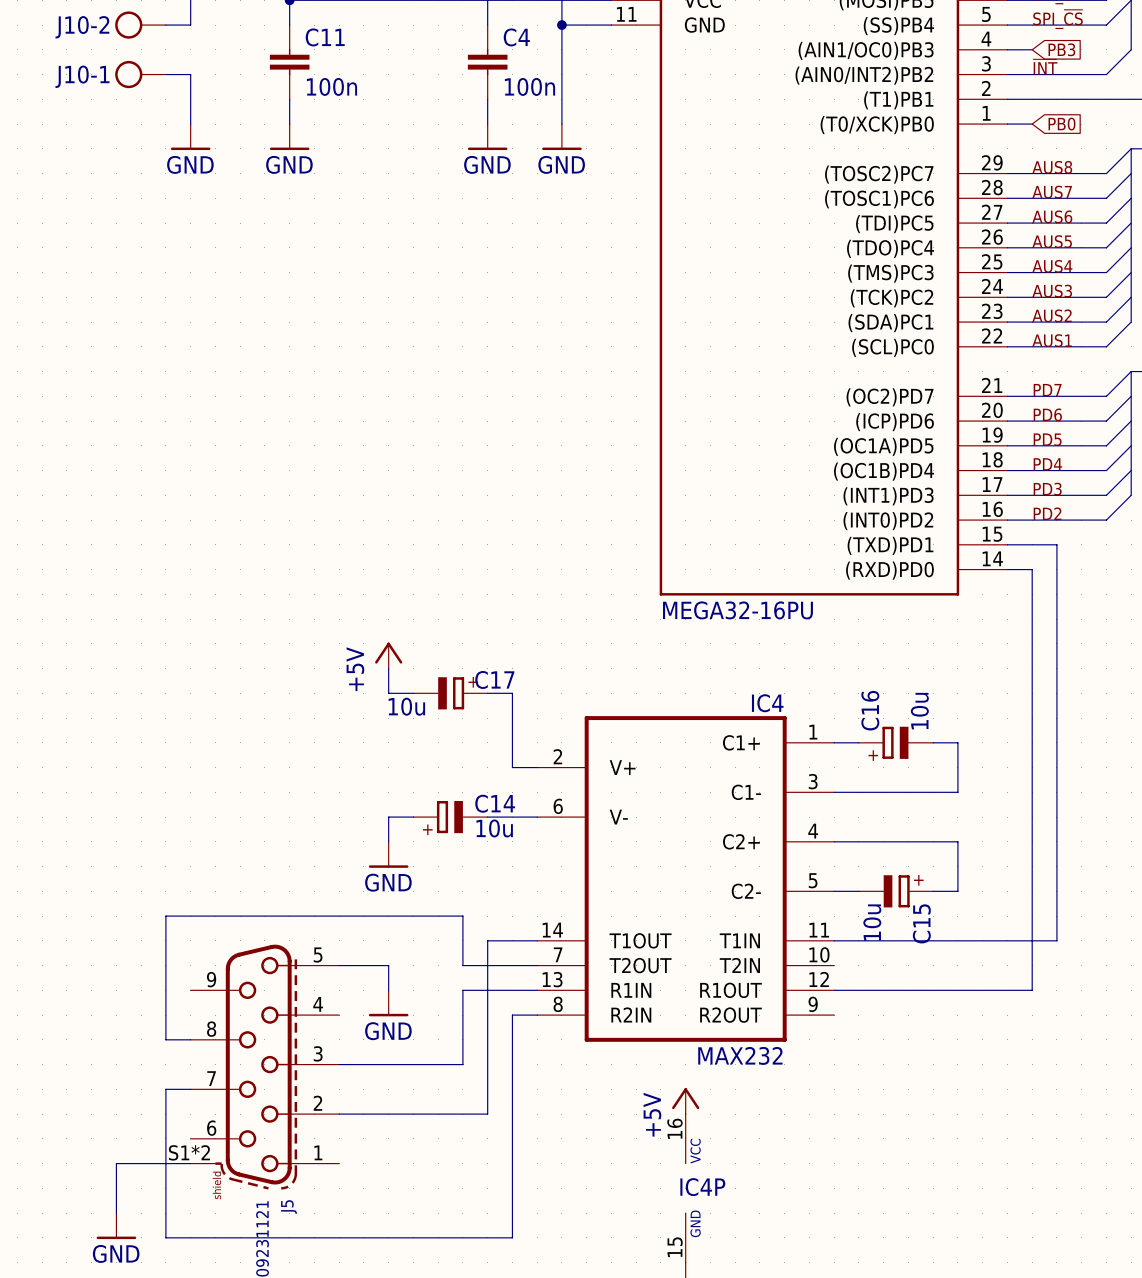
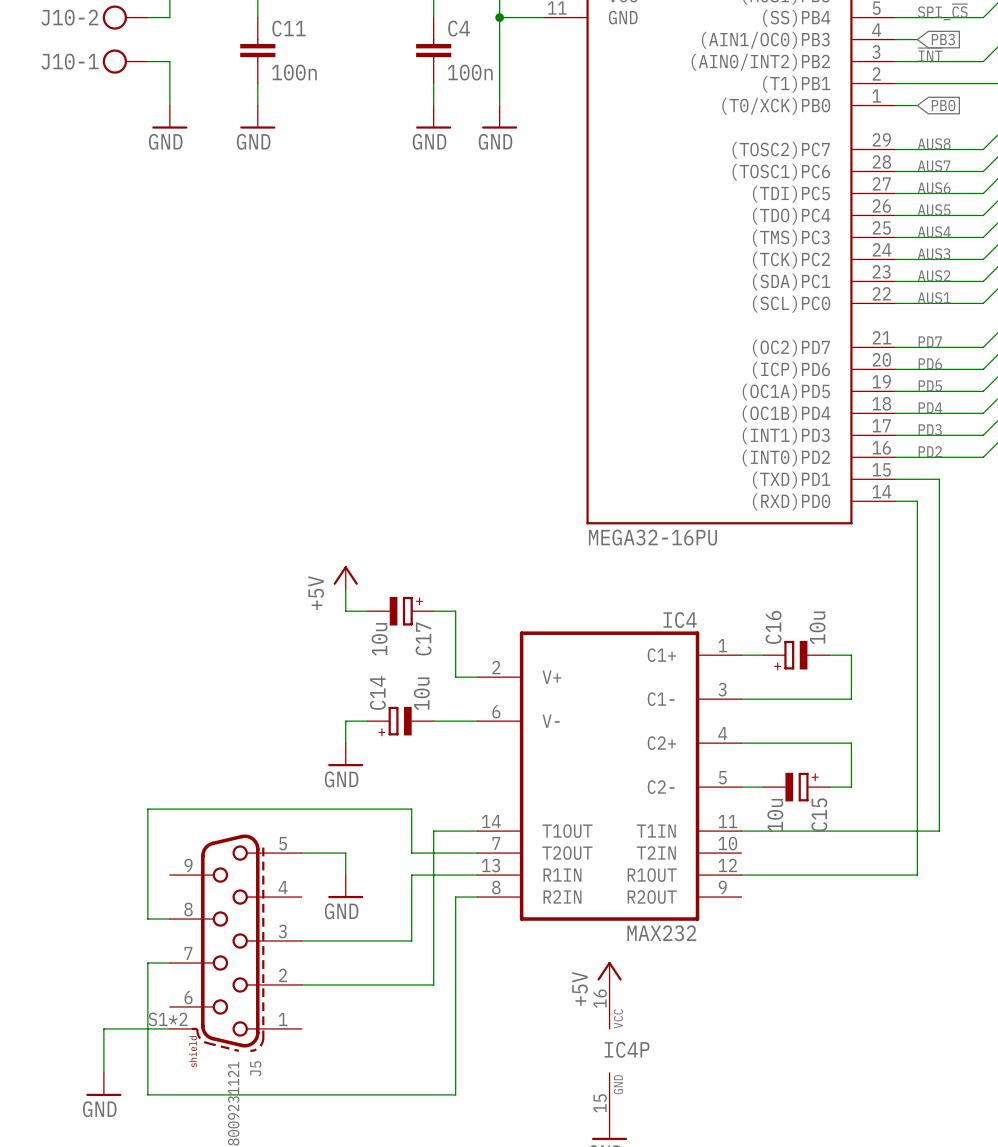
C17 name rotation: 0° (494, 679) -> 90° counterclockwise (423, 638)
C17 name position: C17 (494, 679) -> C17 (423, 638)
C17 value rotation: 0° (406, 706) -> 90° counterclockwise (379, 639)
C14 name rotation: 0° (495, 803) -> 90° counterclockwise (377, 693)
C14 name position: C14 (495, 803) -> C14 (377, 693)
C14 value rotation: 0° (494, 828) -> 90° counterclockwise (421, 693)
C14 value position: 10u (494, 828) -> 10u (421, 693)

